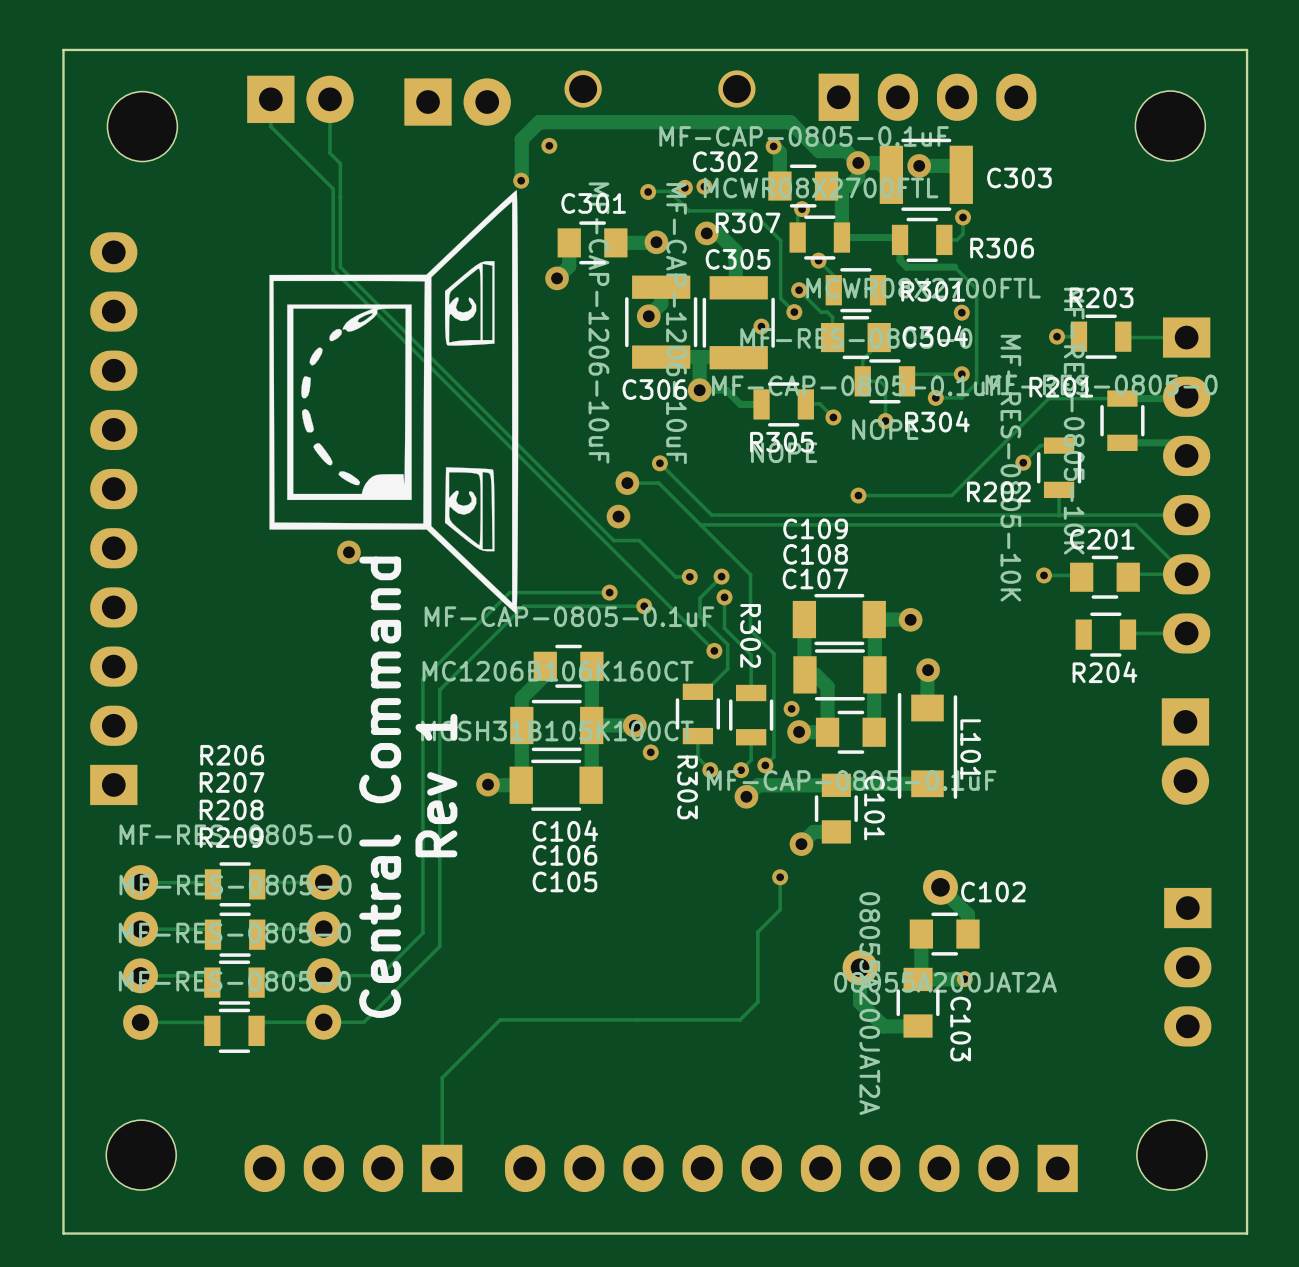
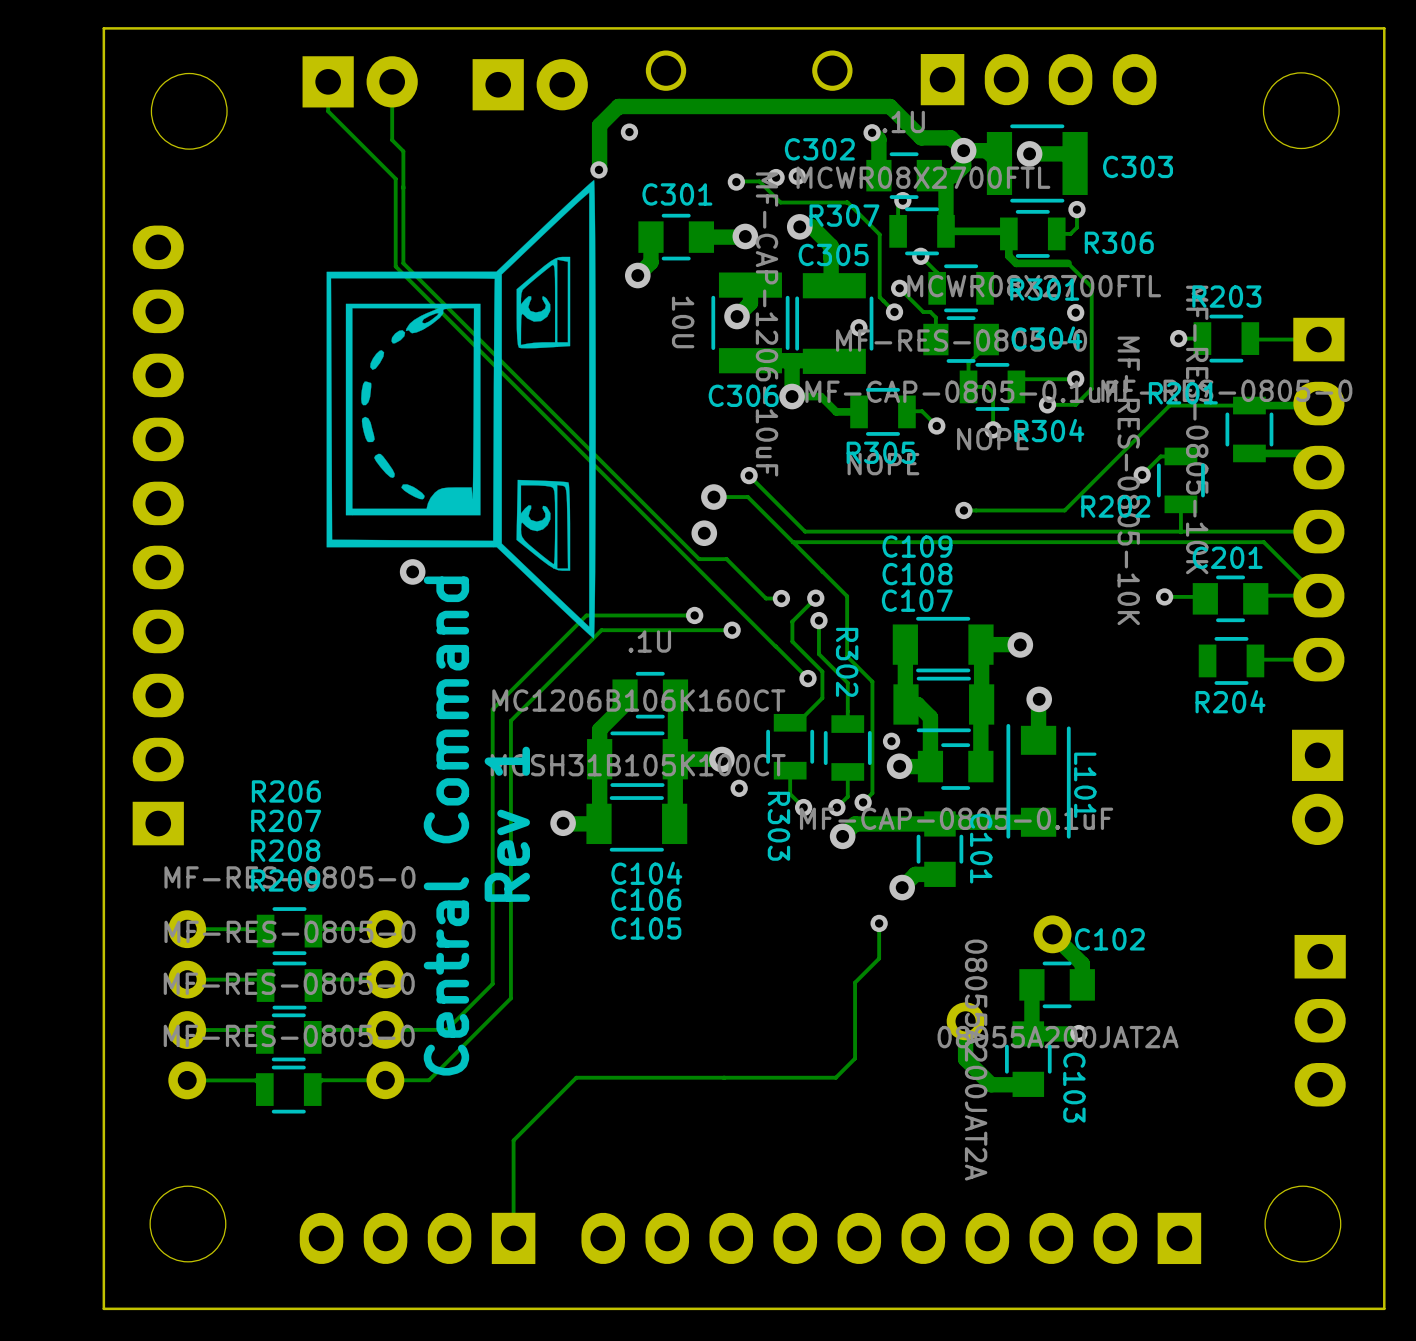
C302 value: MF-CAP-0805-0.1uF (804, 136) -> .1U (903, 122)
C306 value: MF-CAP-1206-10uF (598, 323) -> 10U (683, 322)
C104 value: MF-CAP-0805-0.1uF (569, 616) -> .1U (649, 641)

